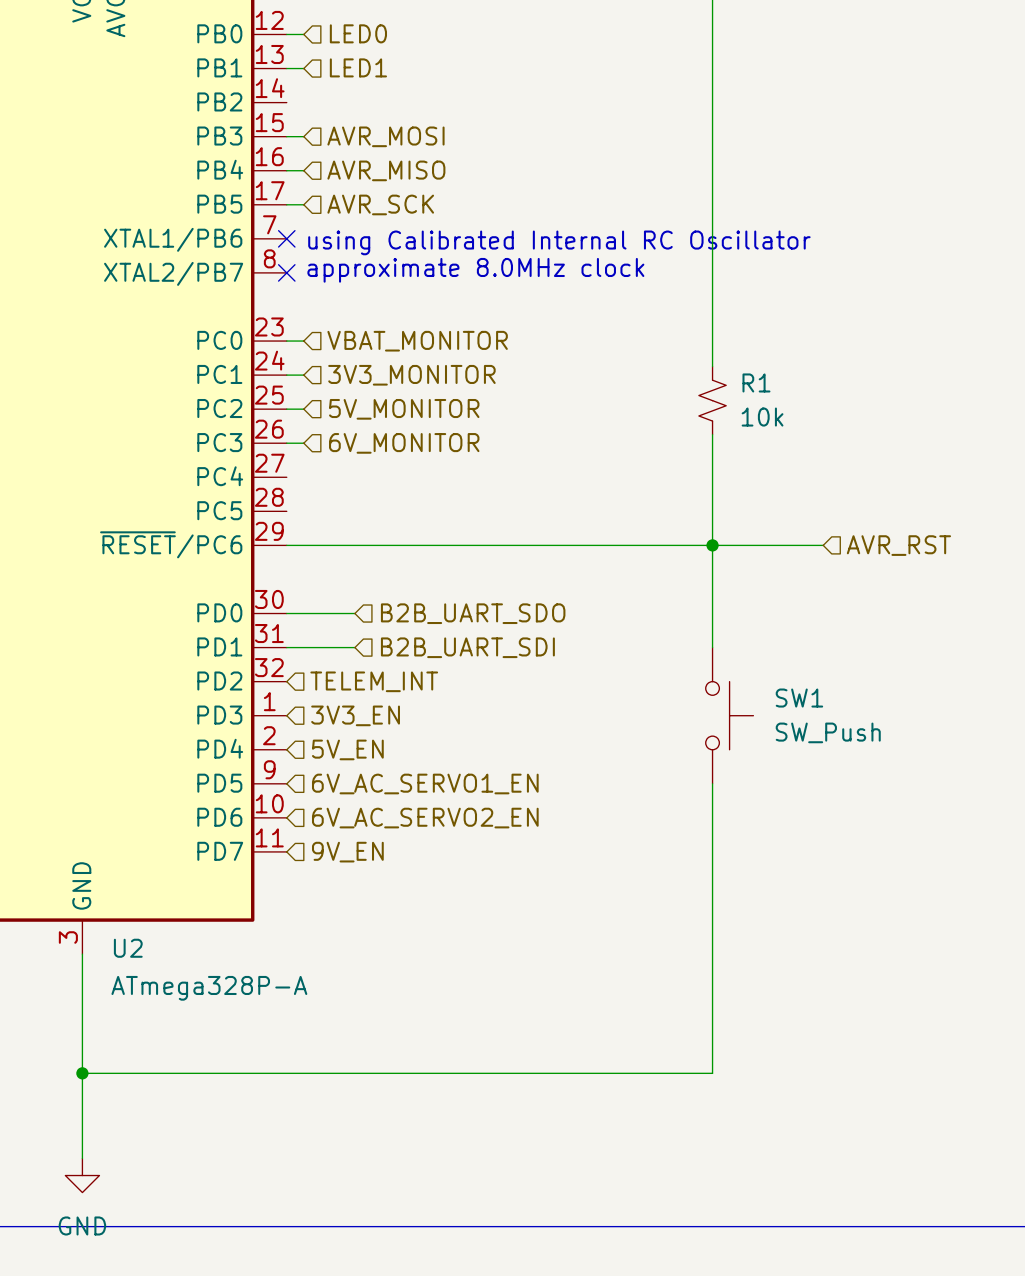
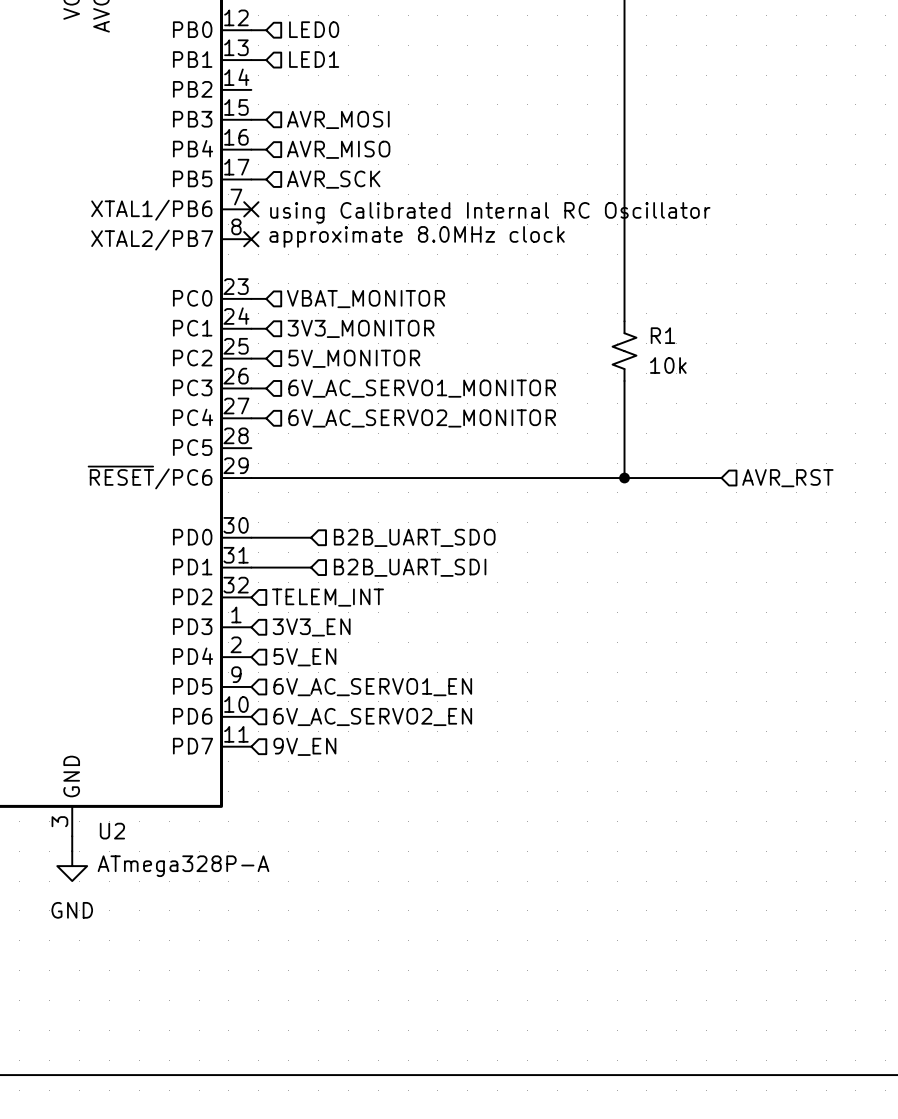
hierarchical label: 6V_MONITOR (404, 443) -> 6V_AC_SERVO1_MONITOR (422, 388)
wire: none -> (251, 418) (266, 418)
hierarchical label: none -> 6V_AC_SERVO2_MONITOR (422, 418)
wire: (712, 545) (712, 647) -> none
SW1: SW_Push (729, 715) -> none
wire: (712, 783) (712, 1073) (82, 1073) -> none
wire: (82, 971) (82, 1158) -> none
junction: (82, 1073) -> none
power symbol position: GND (82, 1175) -> GND (72, 866)

